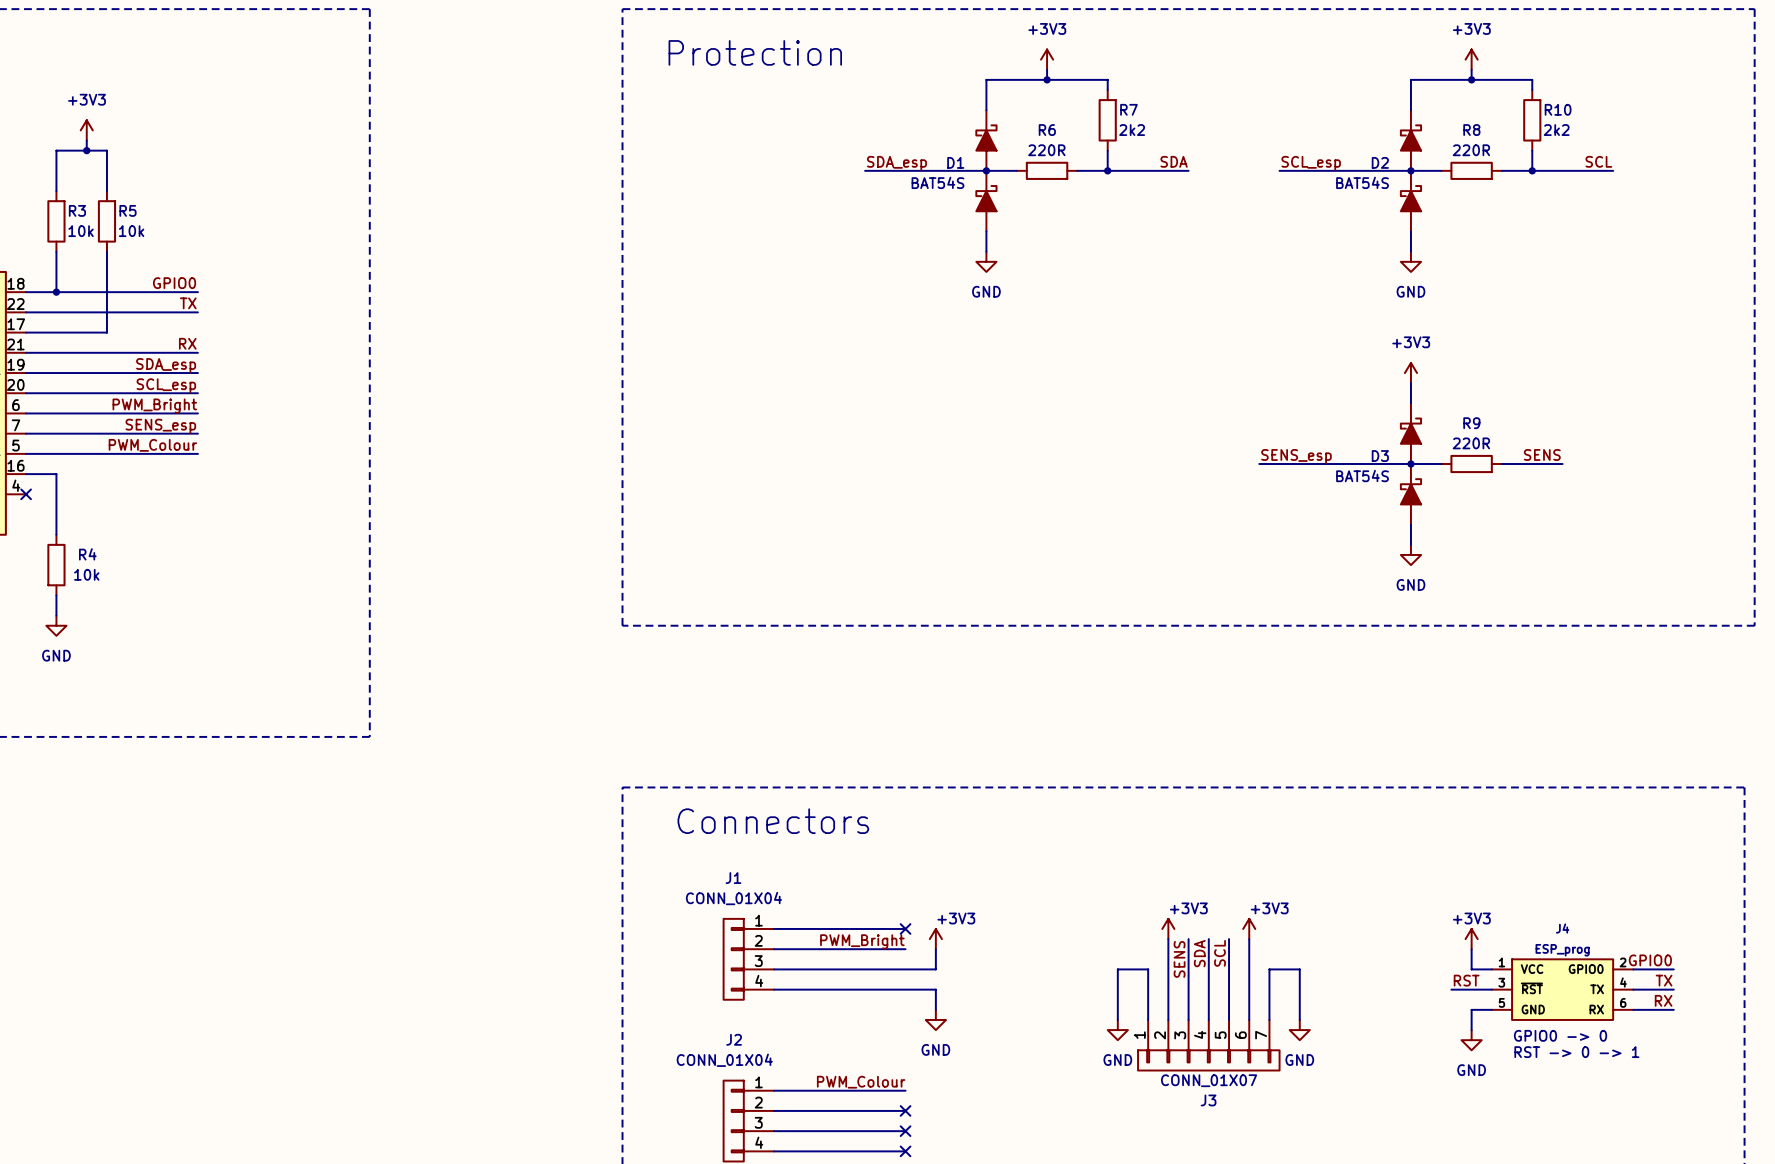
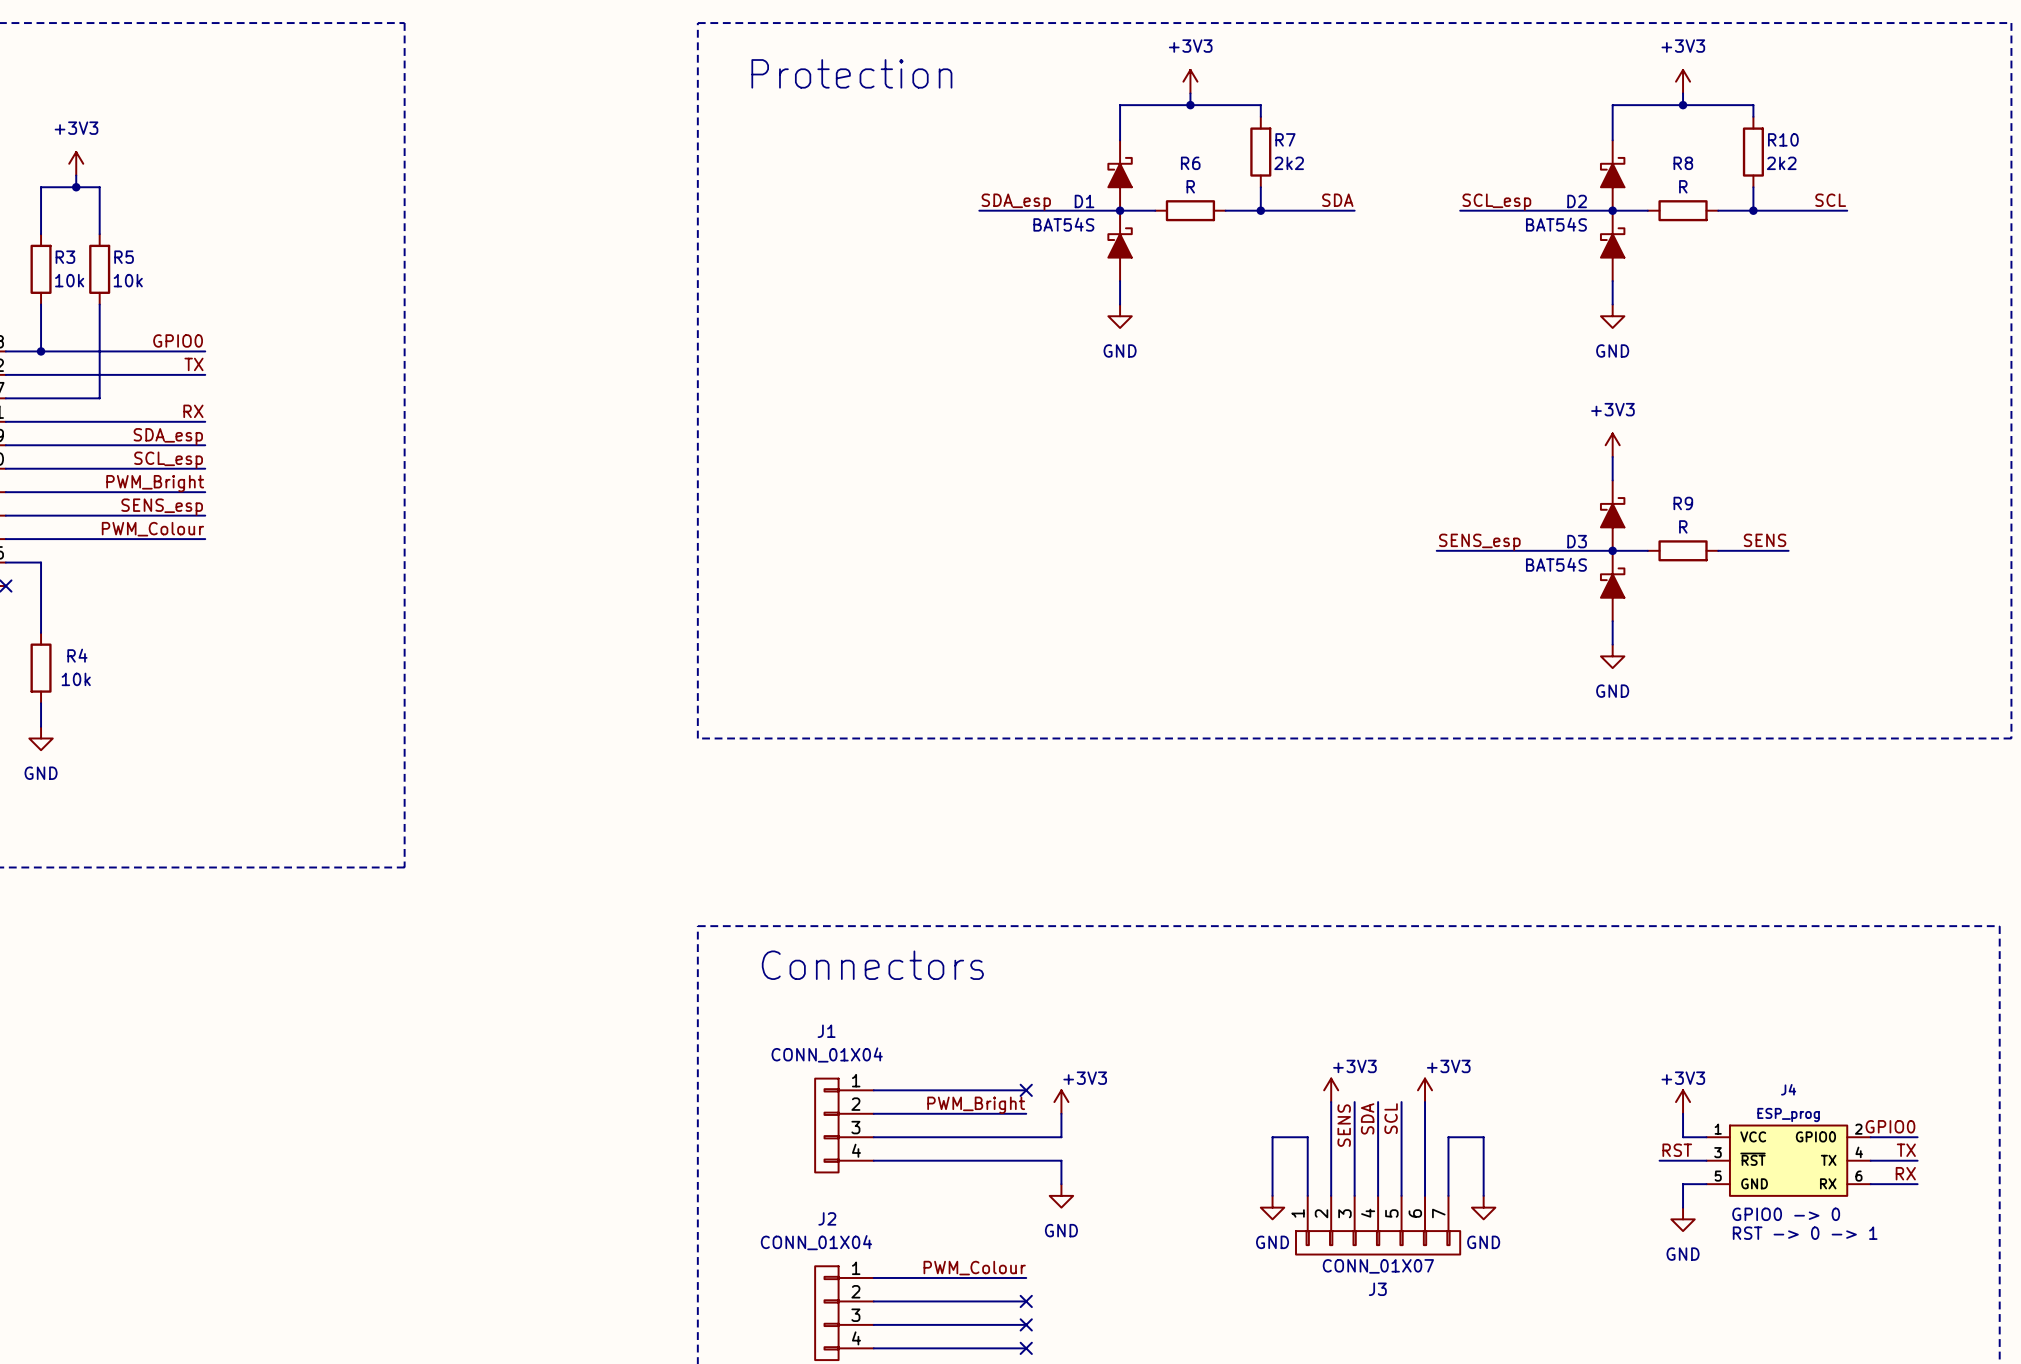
R6 value: 220R (1046, 150) -> R (1190, 186)
R8 value: 220R (1471, 150) -> R (1683, 186)
R9 value: 220R (1471, 443) -> R (1683, 526)

